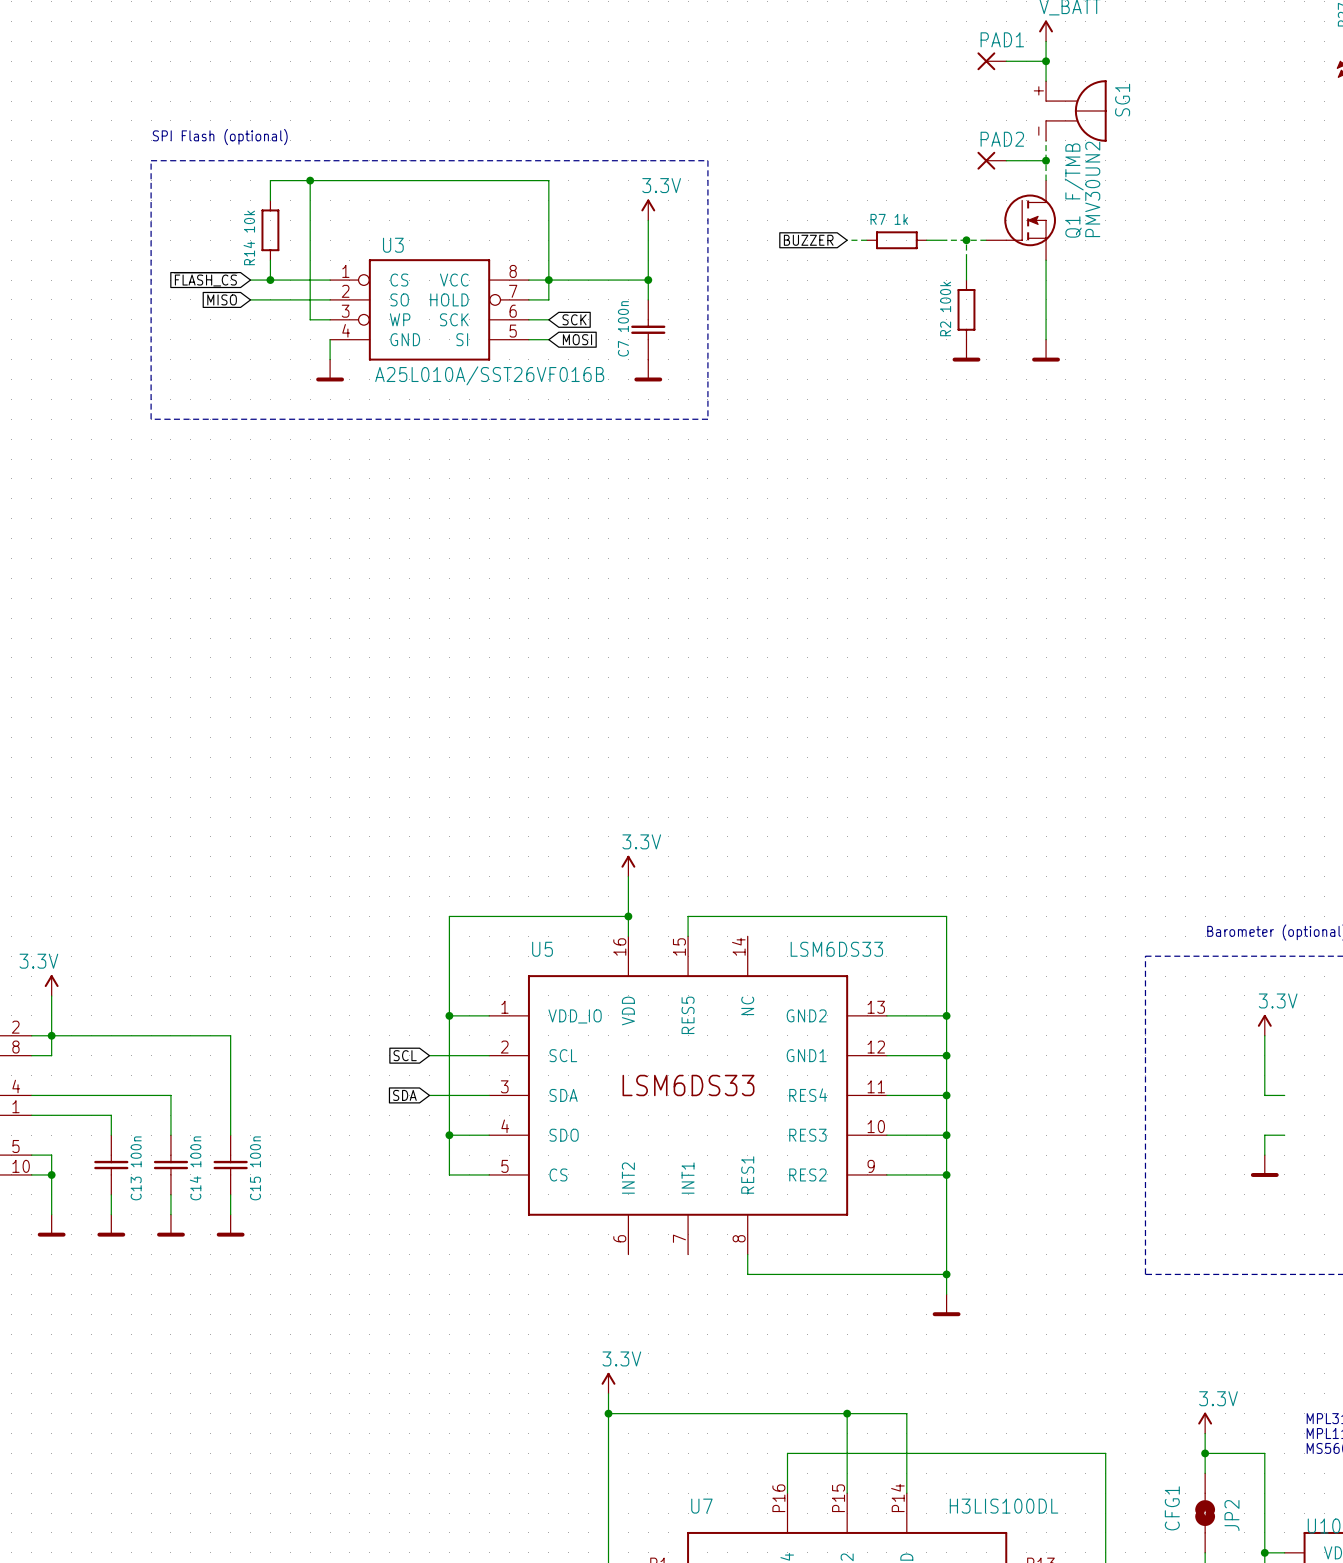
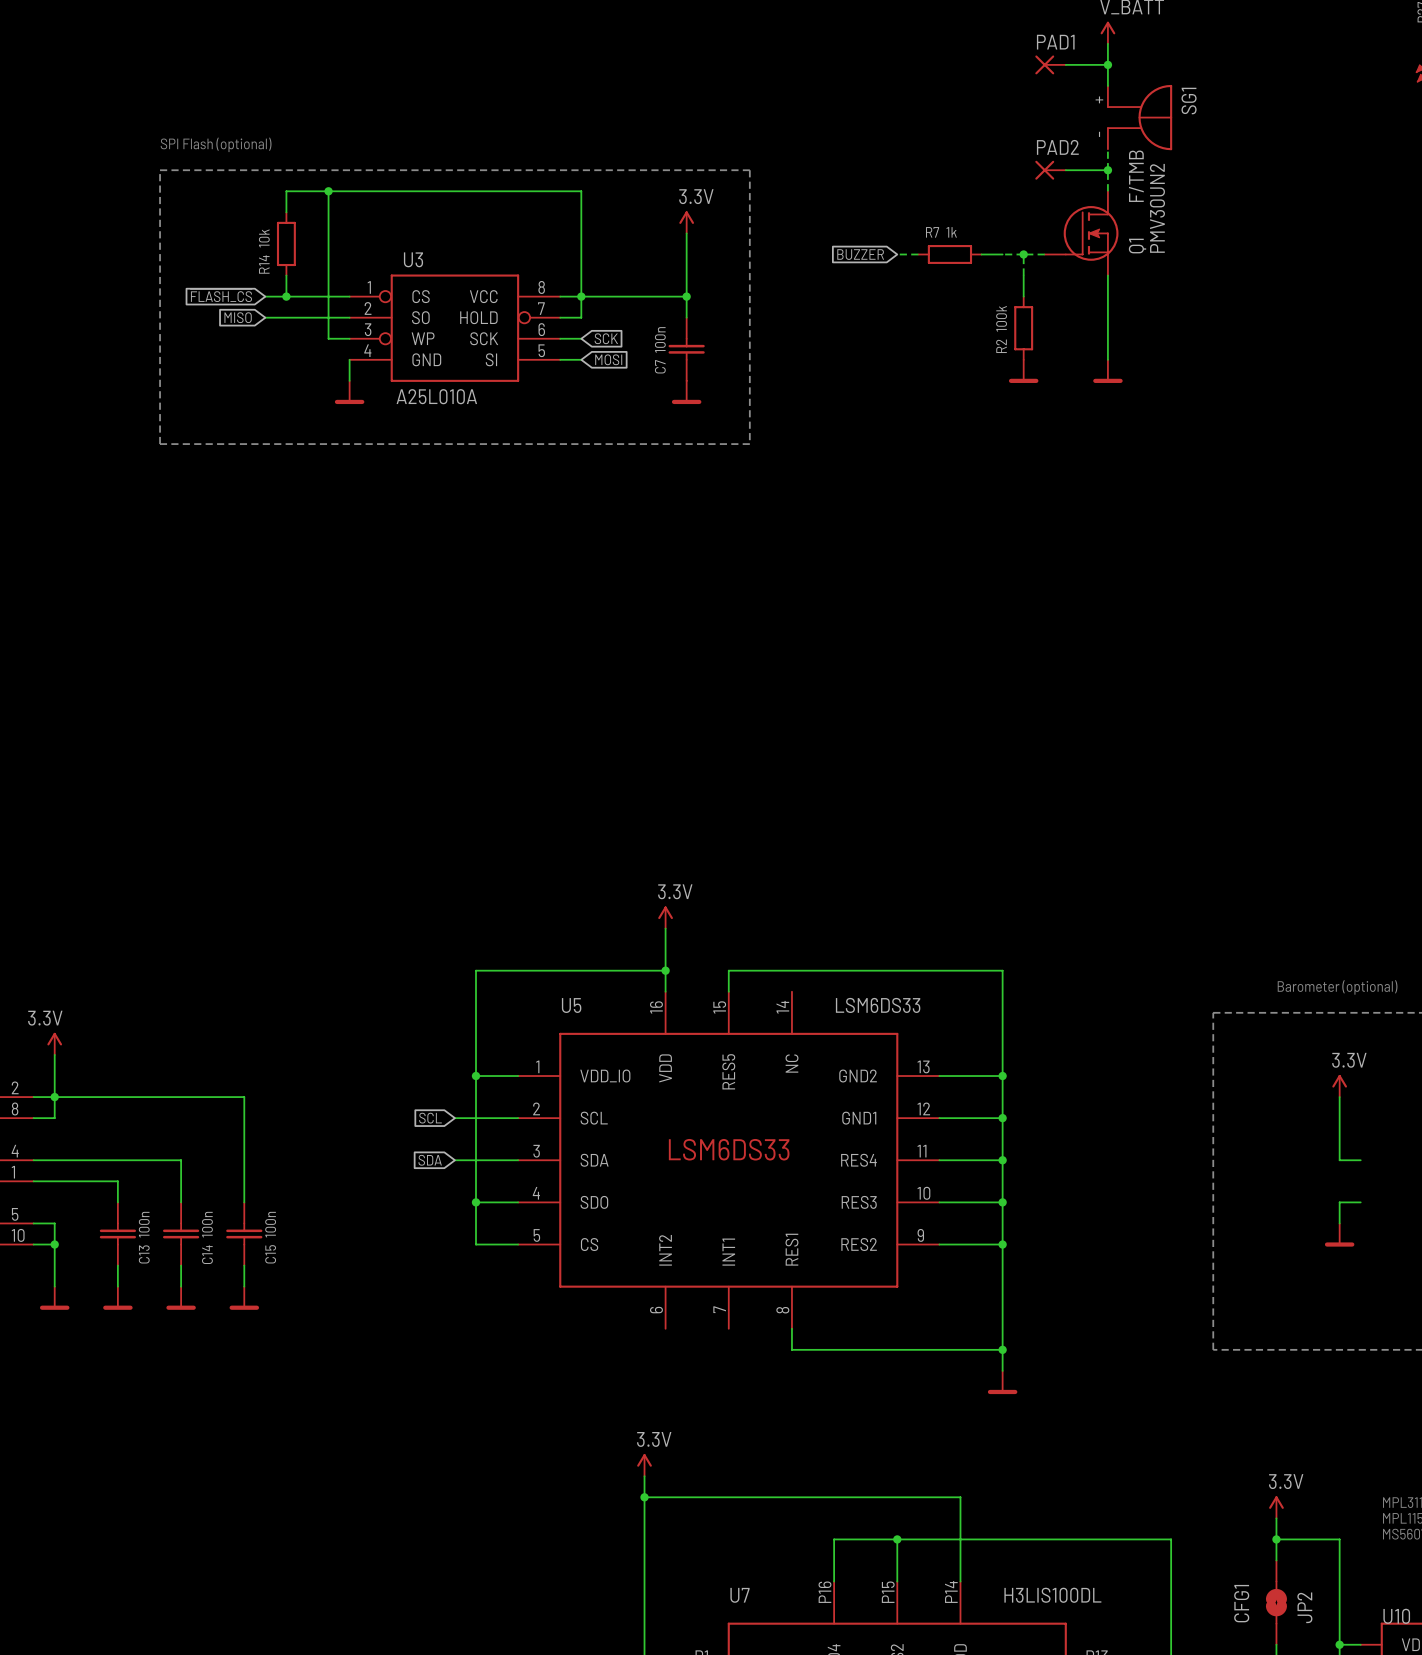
U3 value: A25L010A/SST26VF016B (489, 375) -> A25L010A (436, 396)
wire: (847, 1413) (847, 1453) -> none
junction position: (847, 1413) -> (897, 1539)

